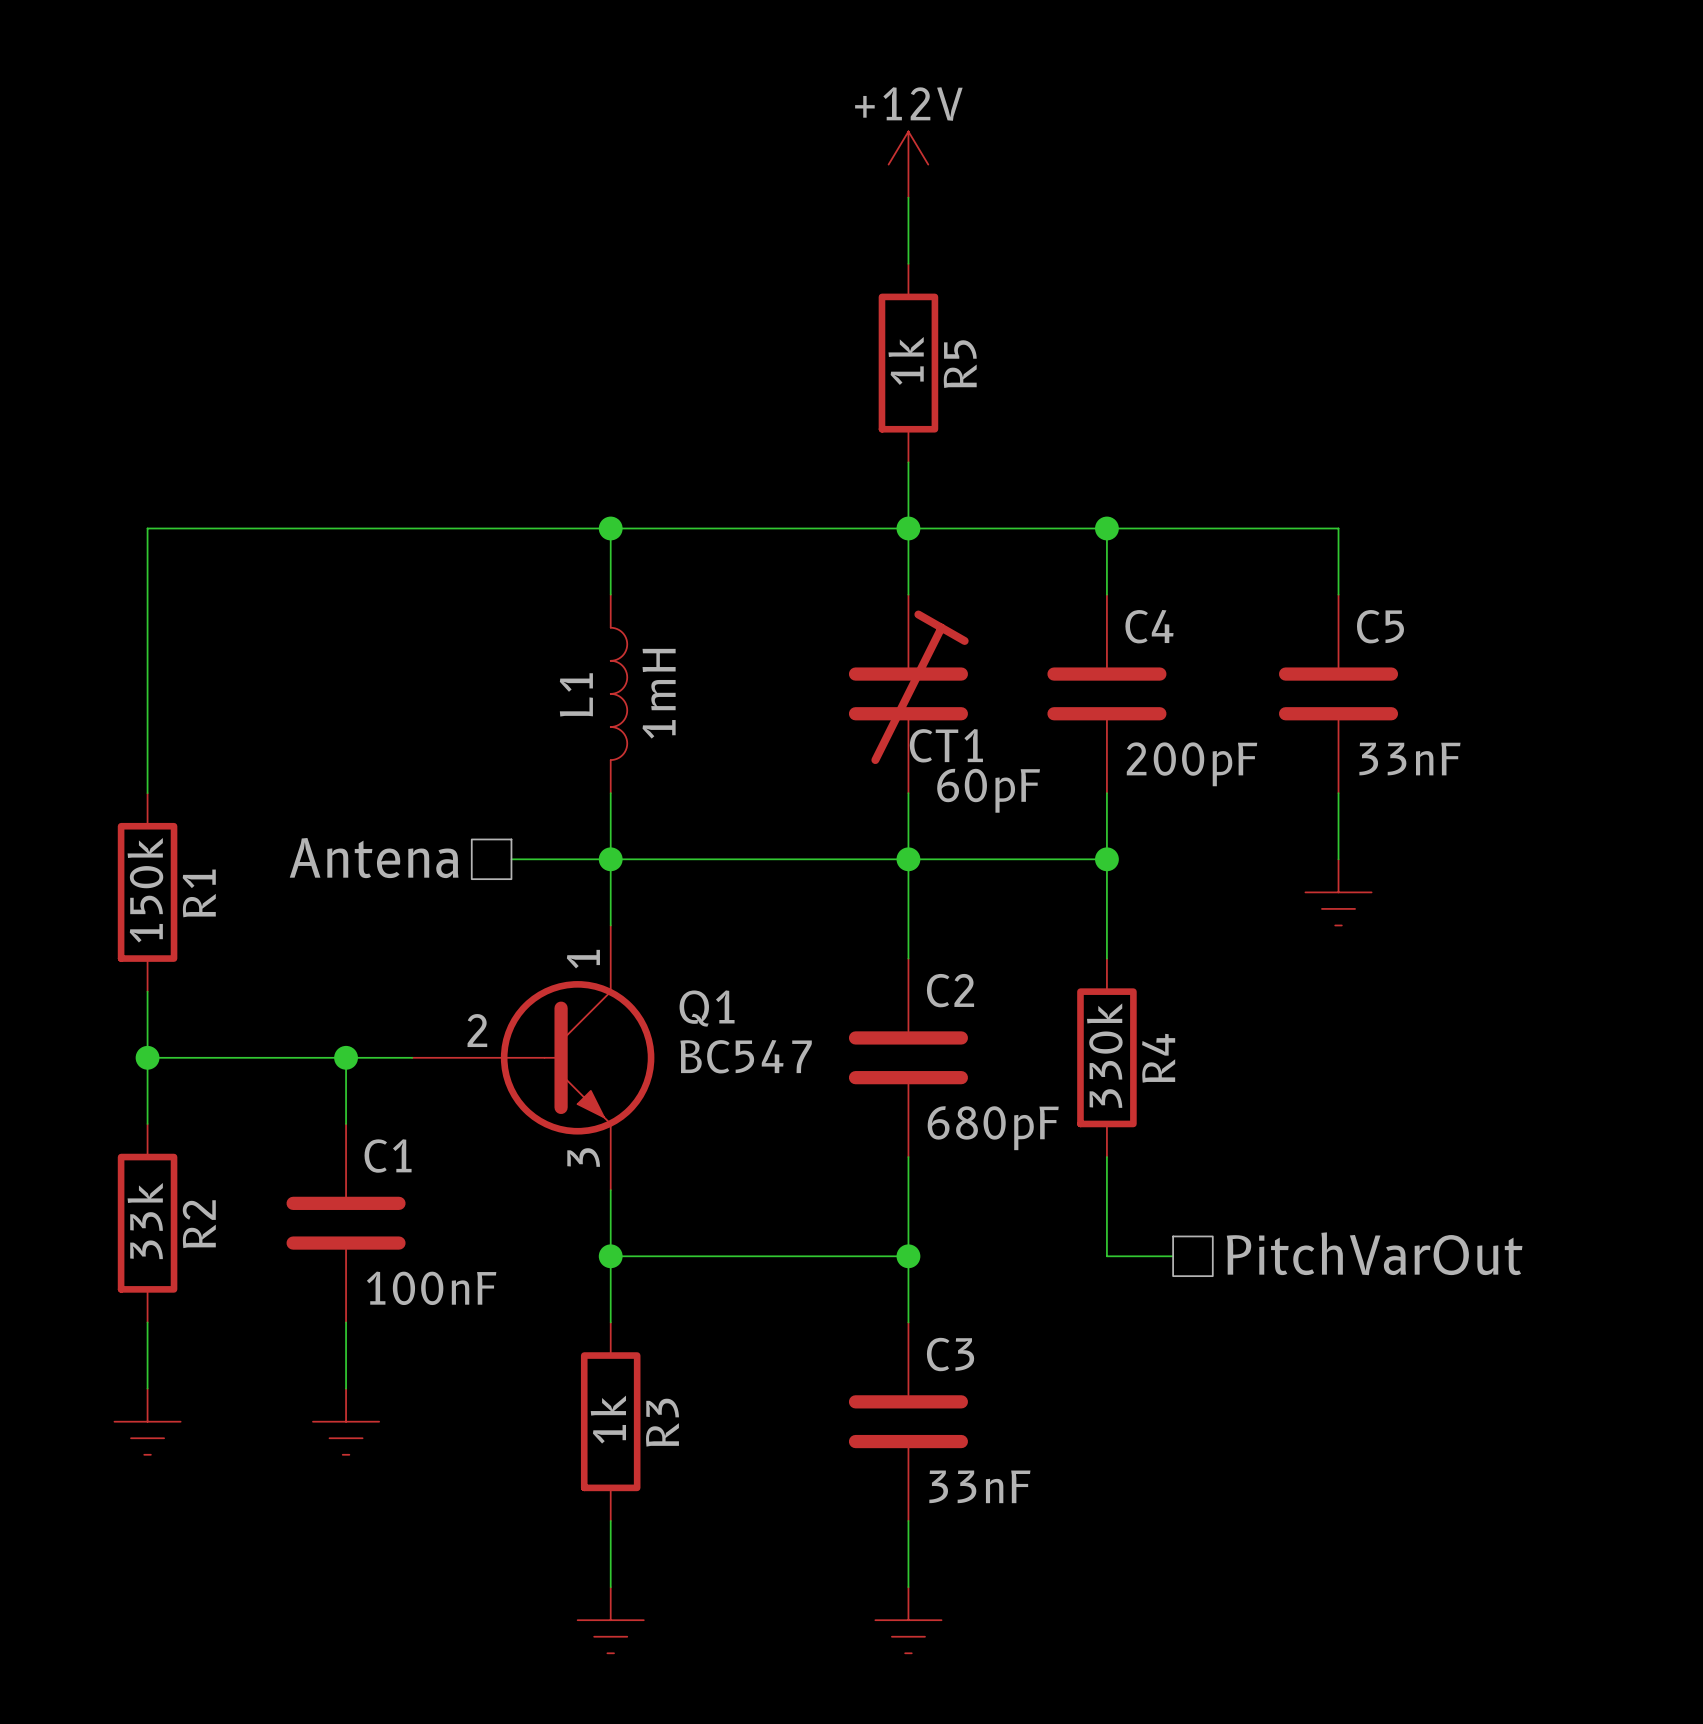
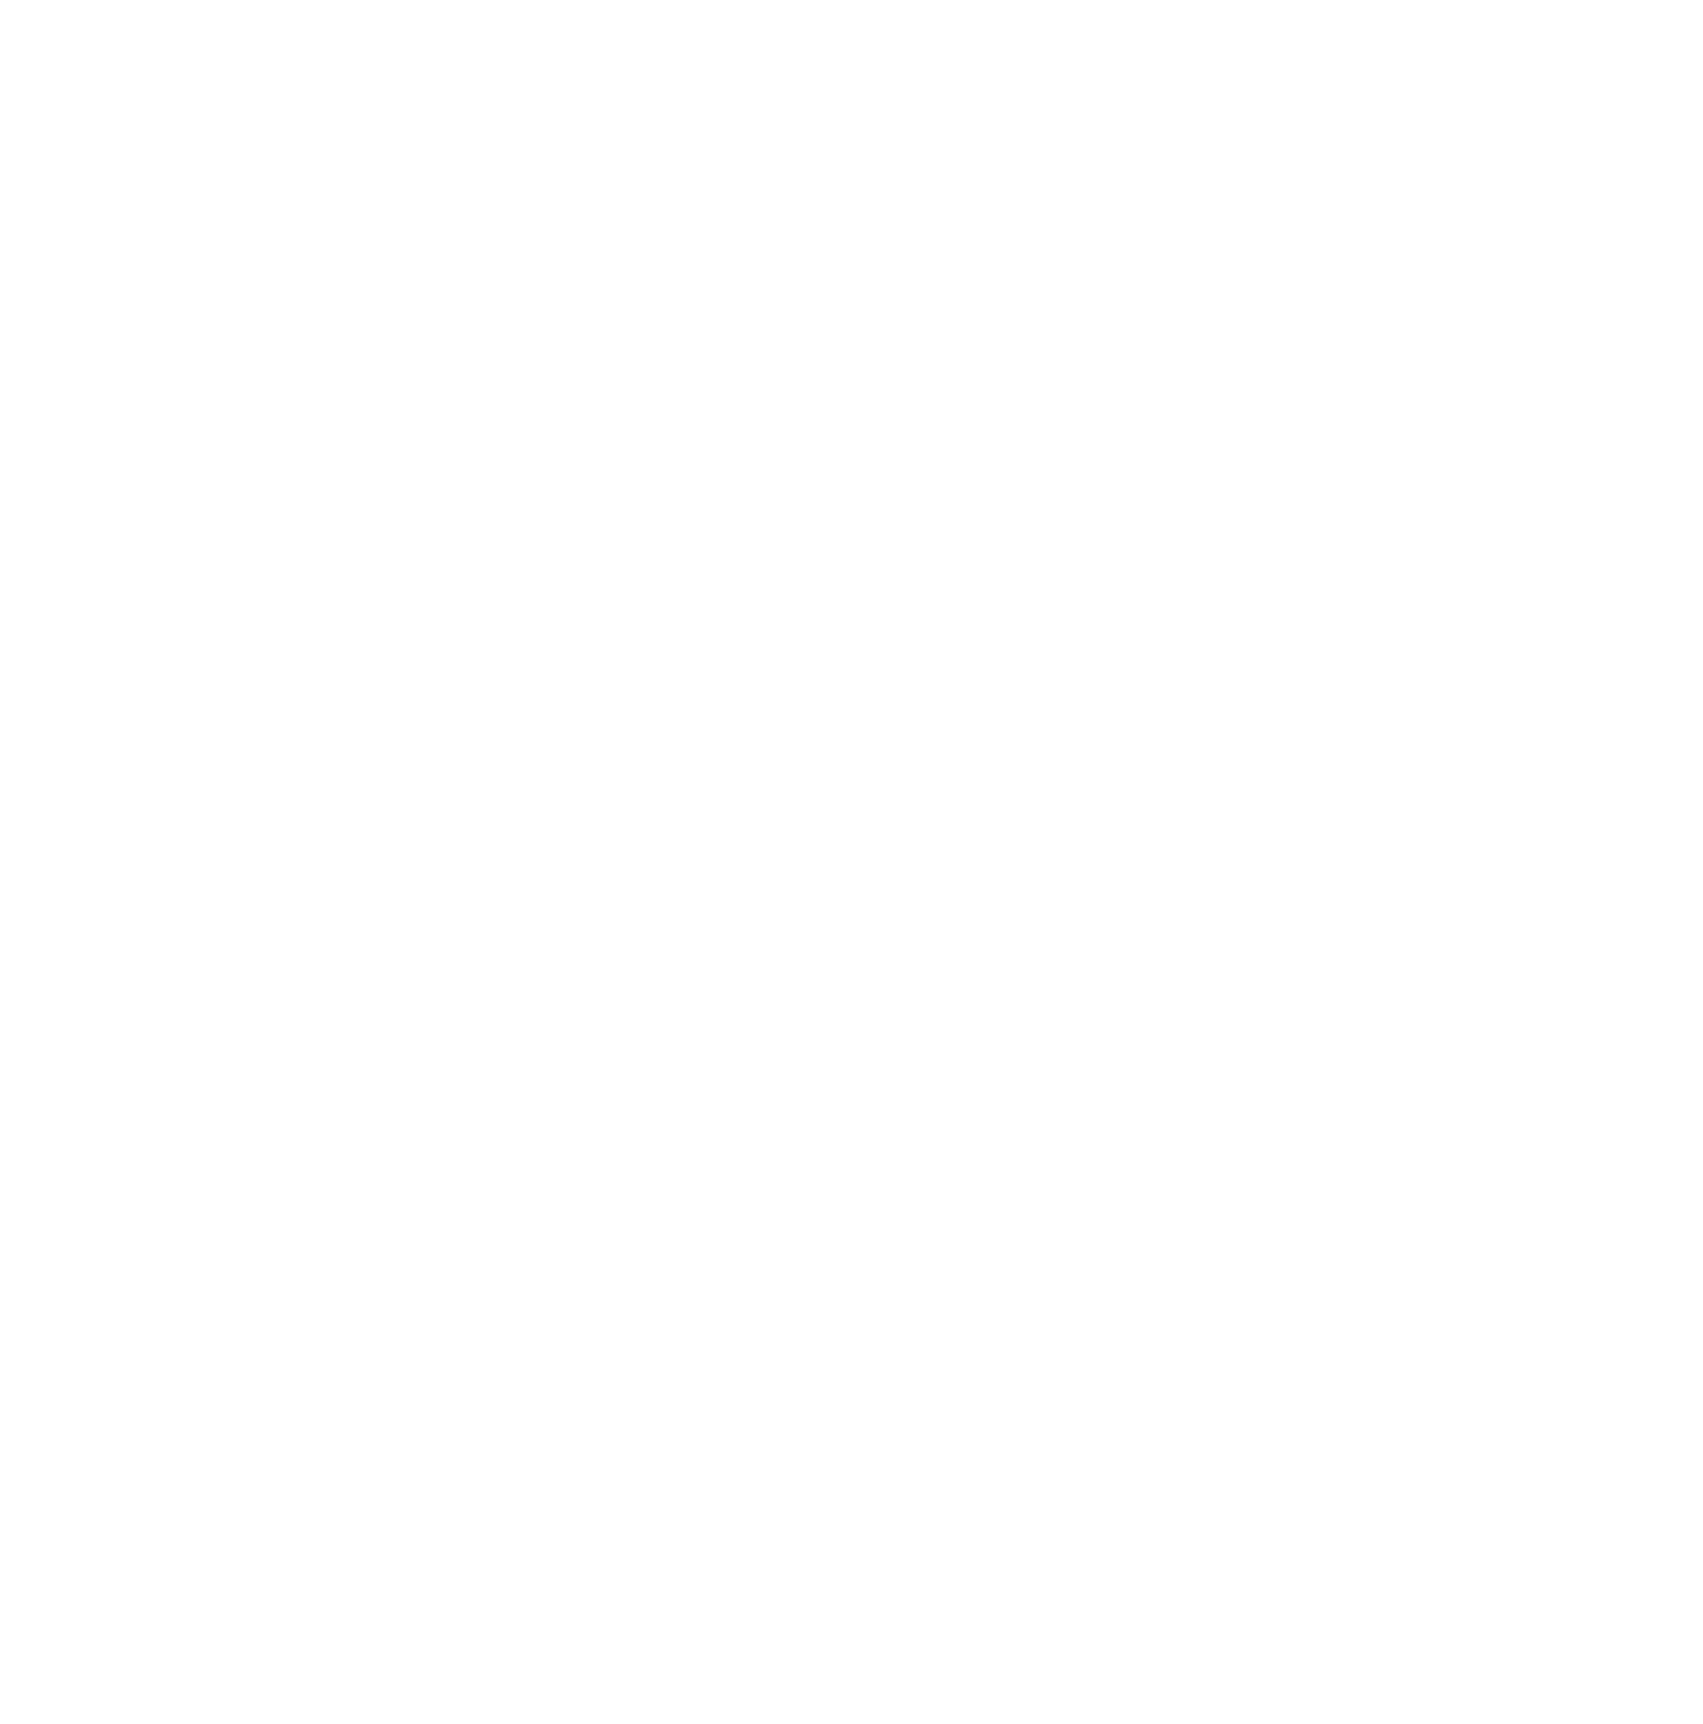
power symbol: +12V (908, 164) -> none
wire: (908, 197) (908, 263) -> none
R5: 1k (908, 363) -> none
wire: (908, 462) (908, 594) -> none
wire: (610, 528) (610, 594) -> none
junction: (610, 528) -> none
junction: (908, 528) -> none
wire: (1106, 528) (1106, 594) -> none
junction: (1106, 528) -> none
wire: (1338, 594) (1338, 528) (147, 528) (147, 793) -> none
L1: 1mH (618, 693) -> none
CT1: 60pF (908, 693) -> none
C4: 200pF (1106, 693) -> none
C5: 33nF (1338, 693) -> none
wire: (610, 793) (610, 925) -> none
wire: (908, 793) (908, 958) -> none
wire: (1106, 793) (1106, 958) -> none
wire: (1338, 793) (1338, 859) -> none
hierarchical label: Antena (374, 858) -> none
wire: (511, 859) (1106, 859) -> none
junction: (610, 859) -> none
junction: (908, 859) -> none
junction: (1106, 859) -> none
R1: 150k (147, 892) -> none
power symbol: (1338, 892) -> none
wire: (147, 991) (147, 1123) -> none
wire: (147, 1057) (412, 1057) -> none
junction: (147, 1057) -> none
wire: (346, 1057) (346, 1123) -> none
junction: (346, 1057) -> none
Q1: BC547 (533, 1057) -> none
C2: 680pF (908, 1057) -> none
R4: 330k (1106, 1057) -> none
wire: (908, 1157) (908, 1322) -> none
wire: (1106, 1157) (1106, 1256) (1173, 1256) -> none
wire: (610, 1190) (610, 1322) -> none
R2: 33k (147, 1223) -> none
C1: 100nF (346, 1223) -> none
hierarchical label: PitchVarOut (1374, 1253) -> none
wire: (610, 1256) (908, 1256) -> none
junction: (610, 1256) -> none
junction: (908, 1256) -> none
wire: (147, 1322) (147, 1388) -> none
wire: (346, 1322) (346, 1388) -> none
power symbol: (147, 1421) -> none
power symbol: (346, 1421) -> none
R3: 1k (610, 1421) -> none
C3: 33nF (908, 1421) -> none
wire: (610, 1520) (610, 1587) -> none
wire: (908, 1520) (908, 1587) -> none
power symbol: (610, 1620) -> none
power symbol: (908, 1620) -> none

